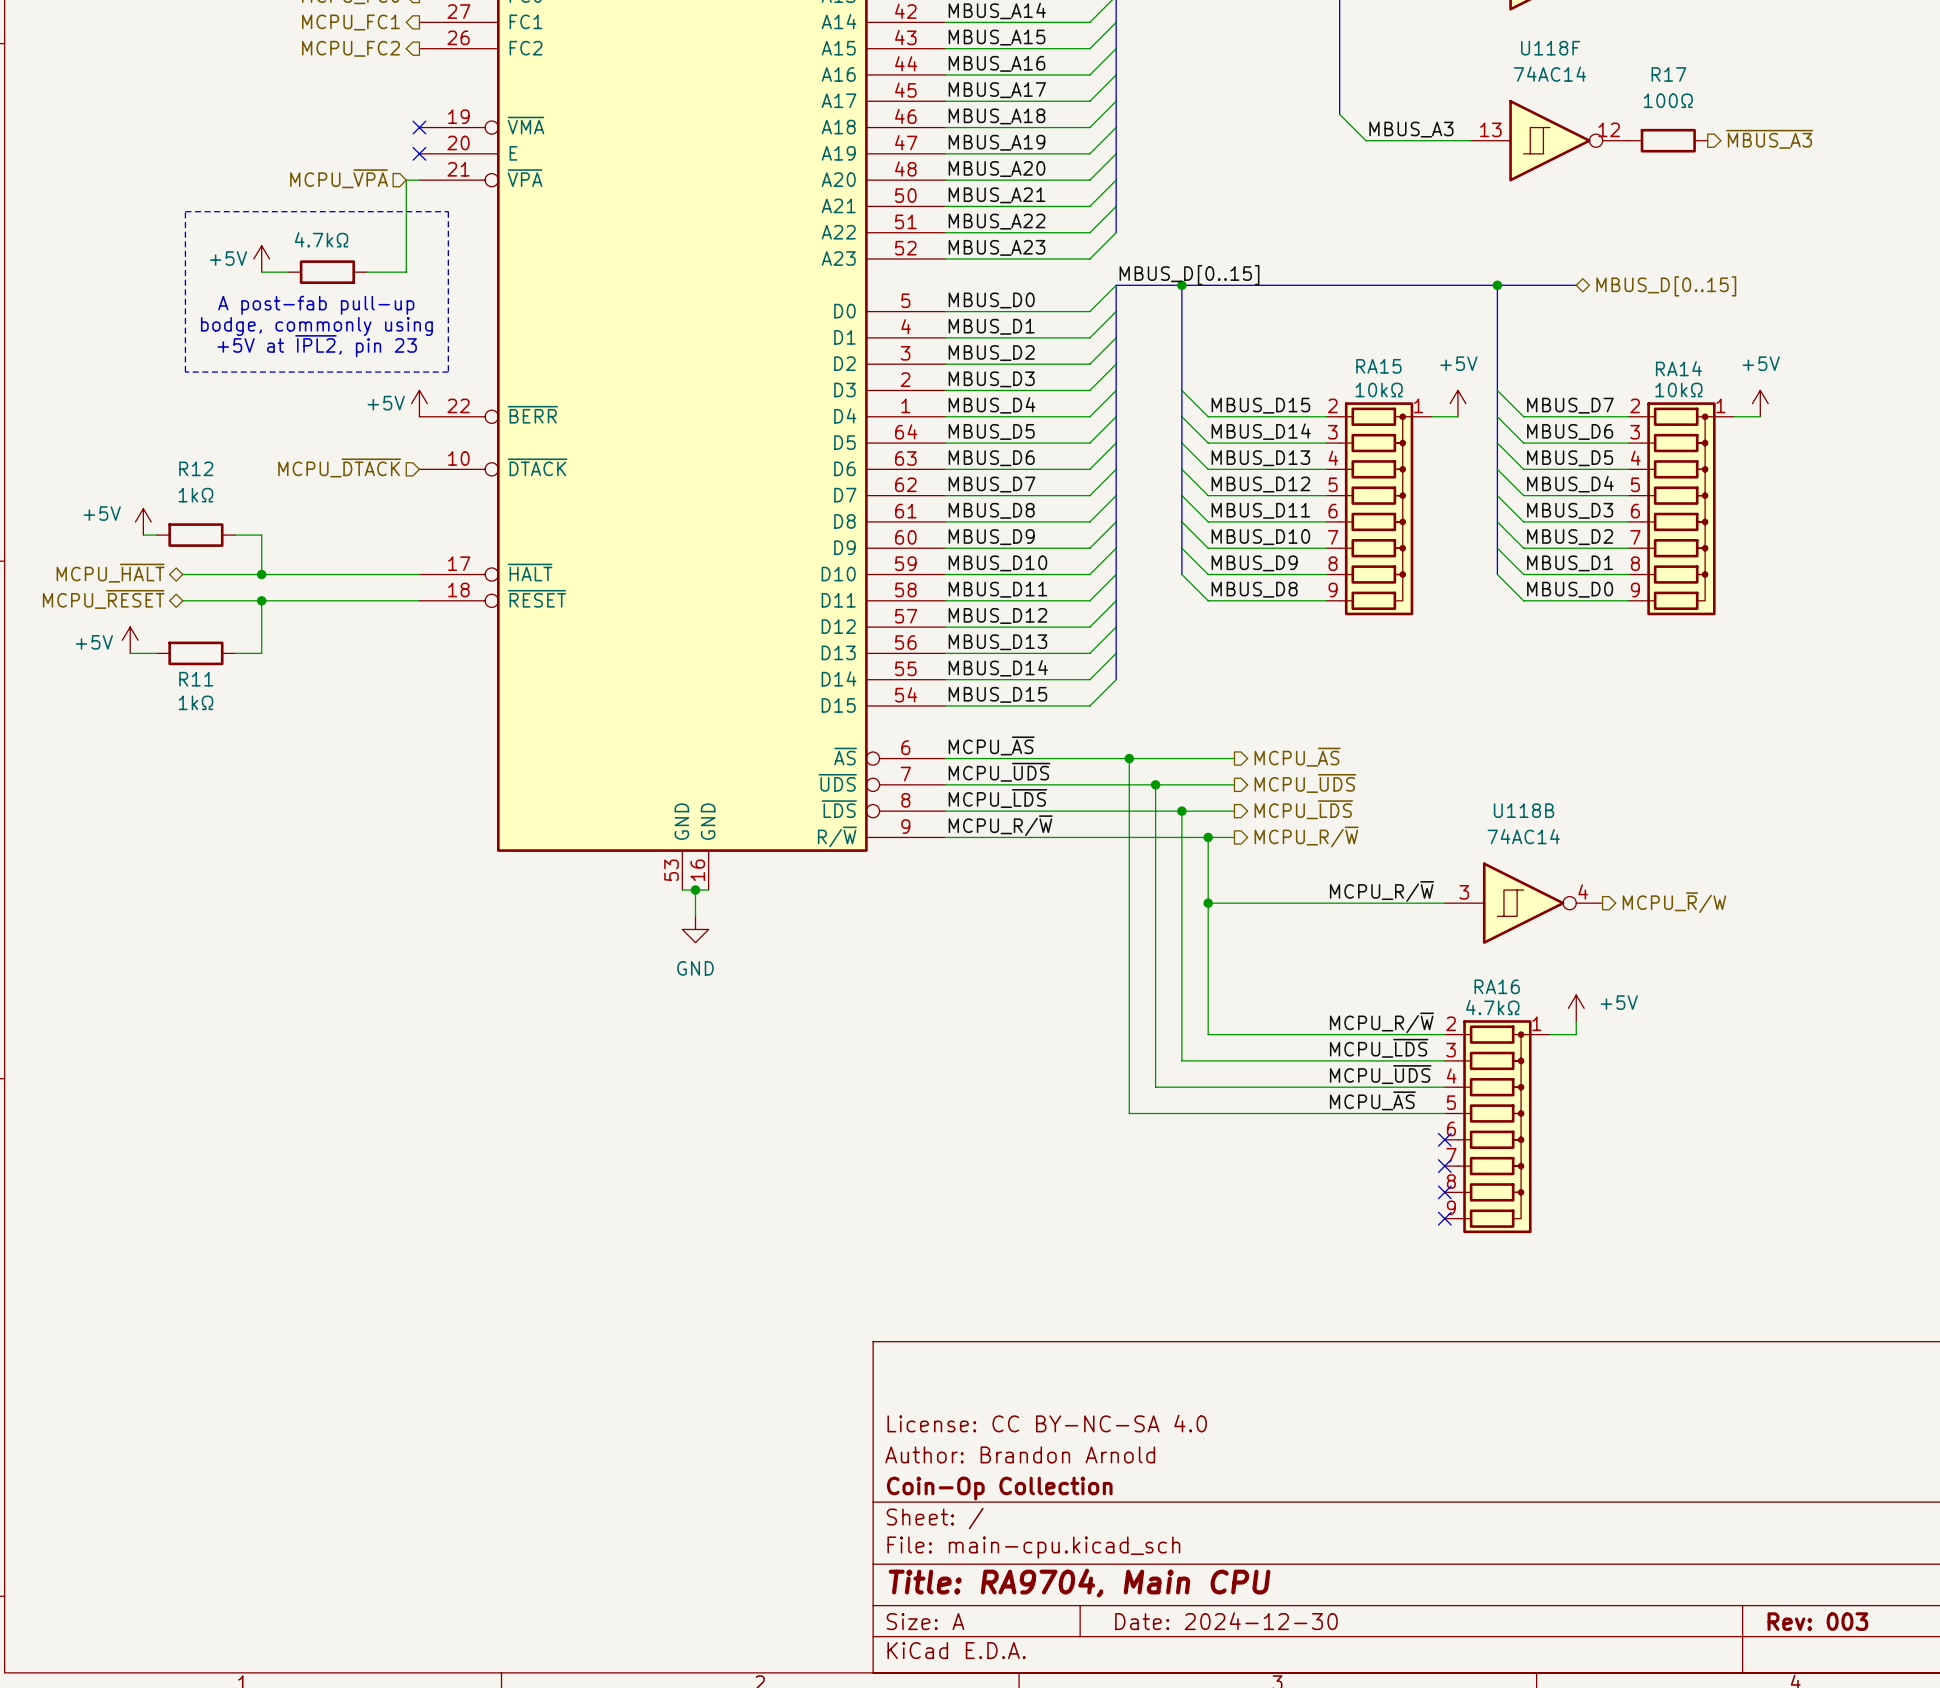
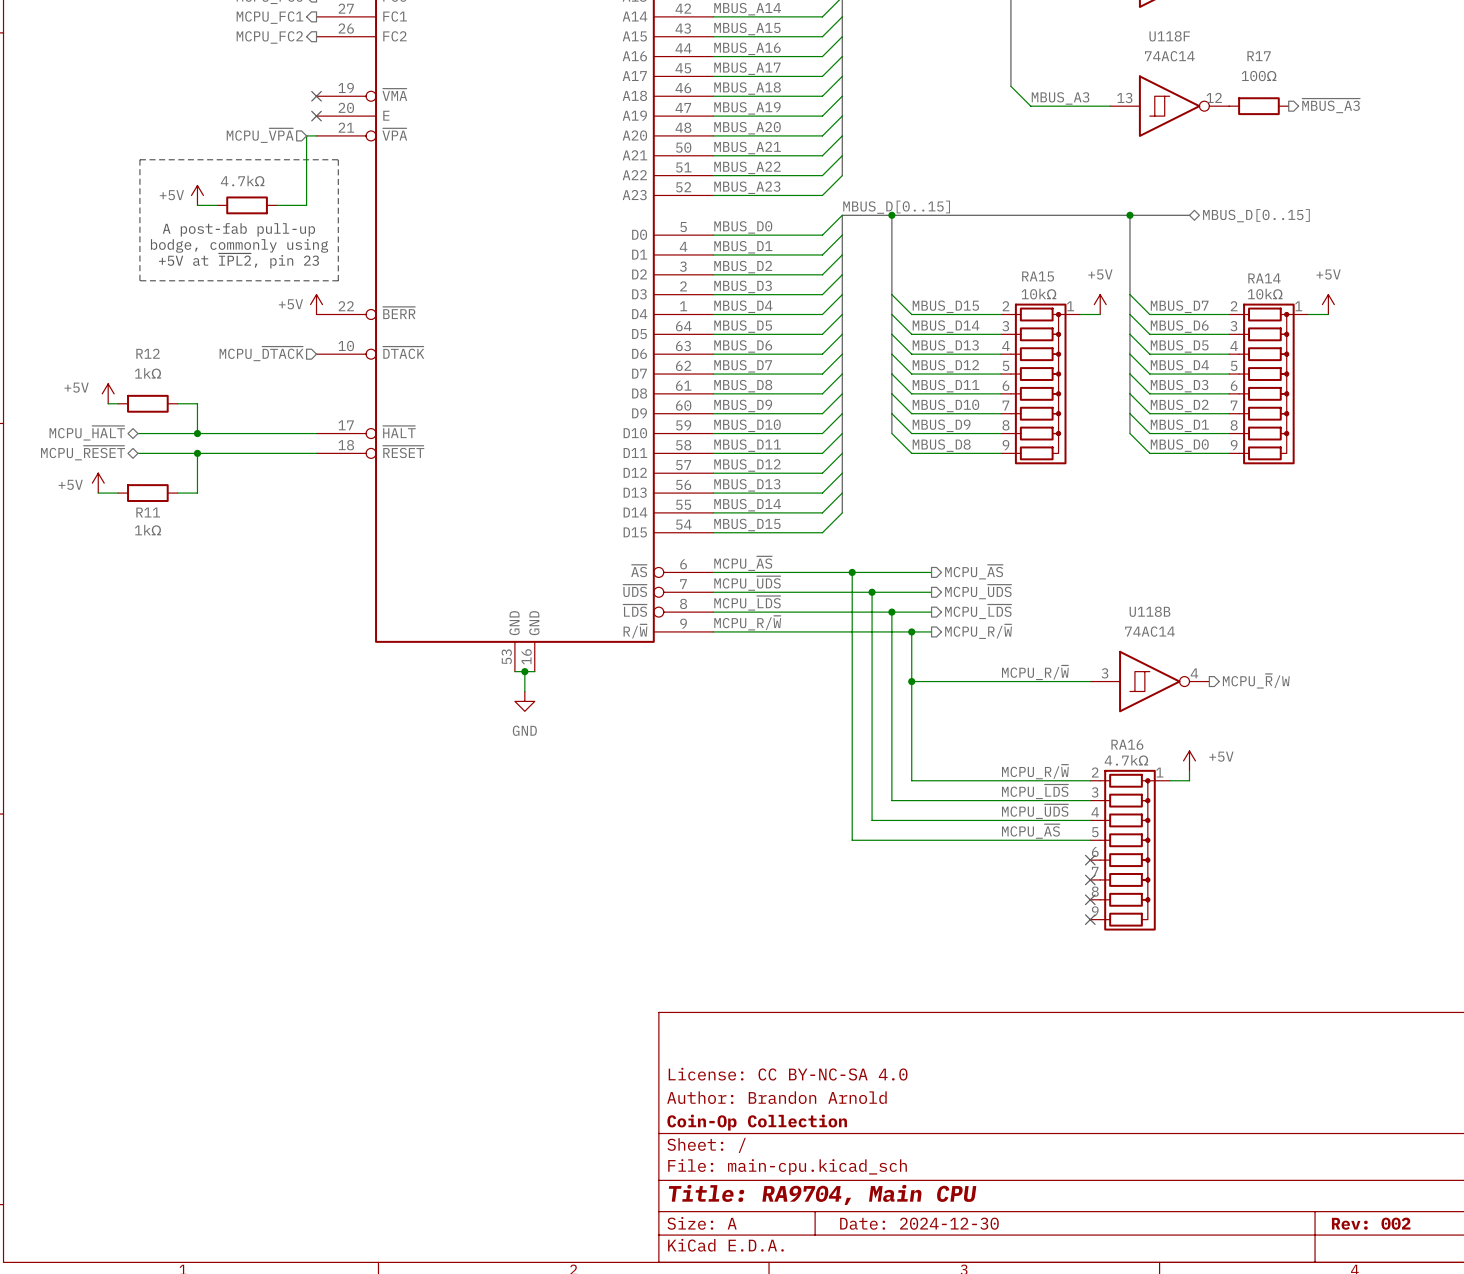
title block: Rev: 003 (1817, 1621) -> Rev: 002 (1371, 1223)

